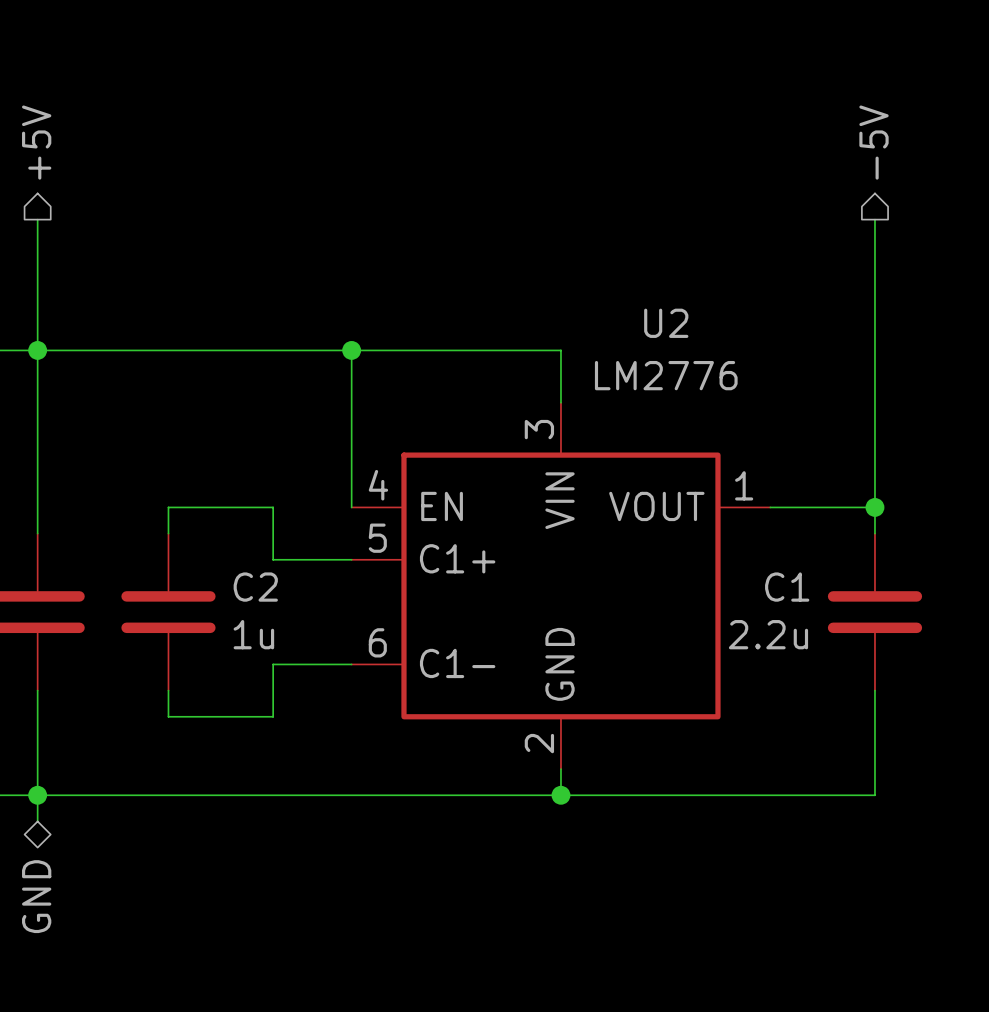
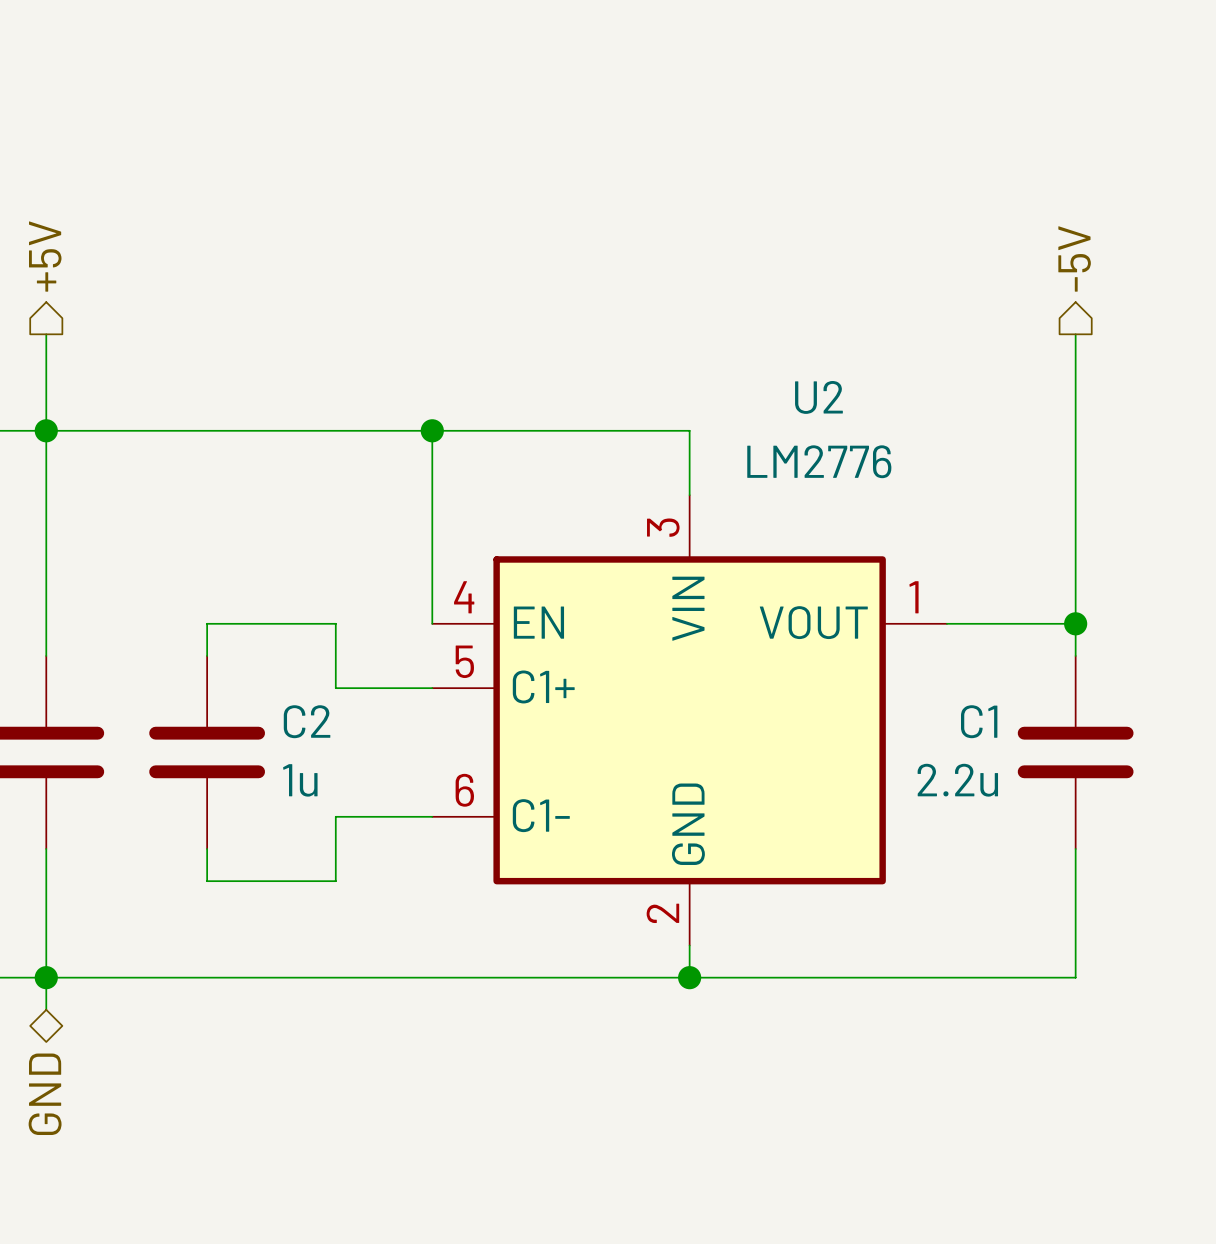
hierarchical label position: +5V (36, 142) -> +5V (45, 256)
hierarchical label position: -5V (874, 142) -> -5V (1074, 258)
wire: (37, 219) (37, 271) -> none
wire: (874, 219) (874, 271) -> none

